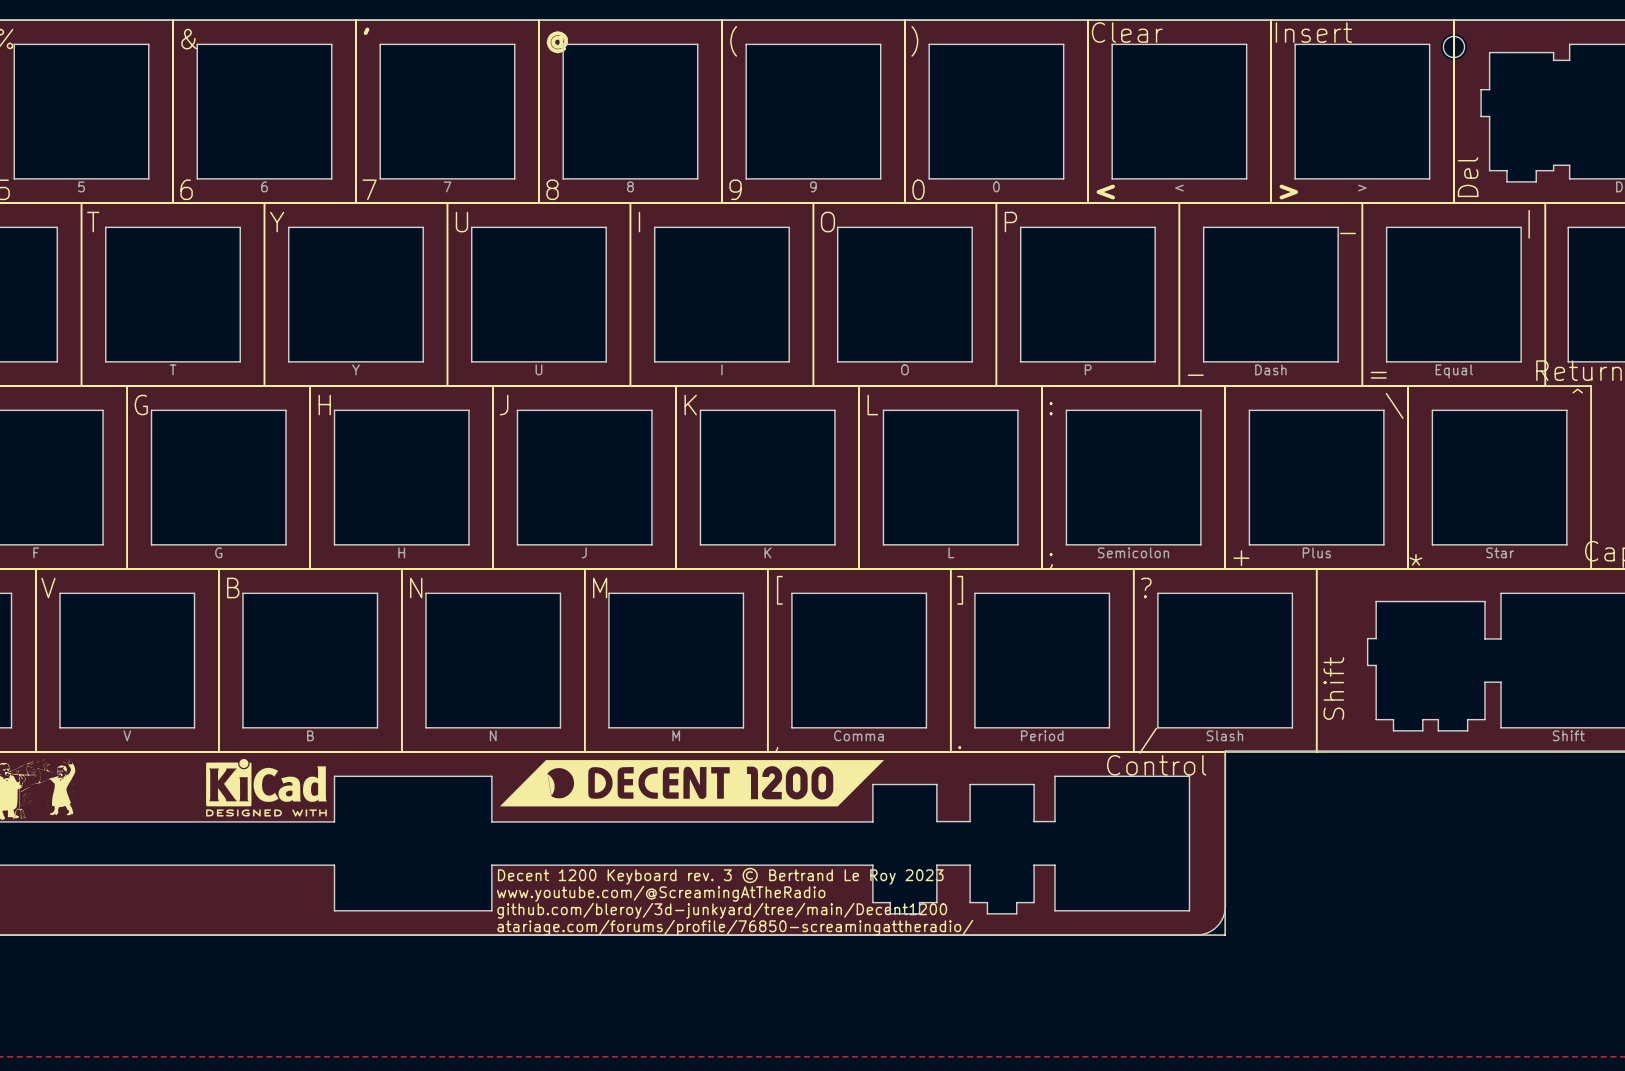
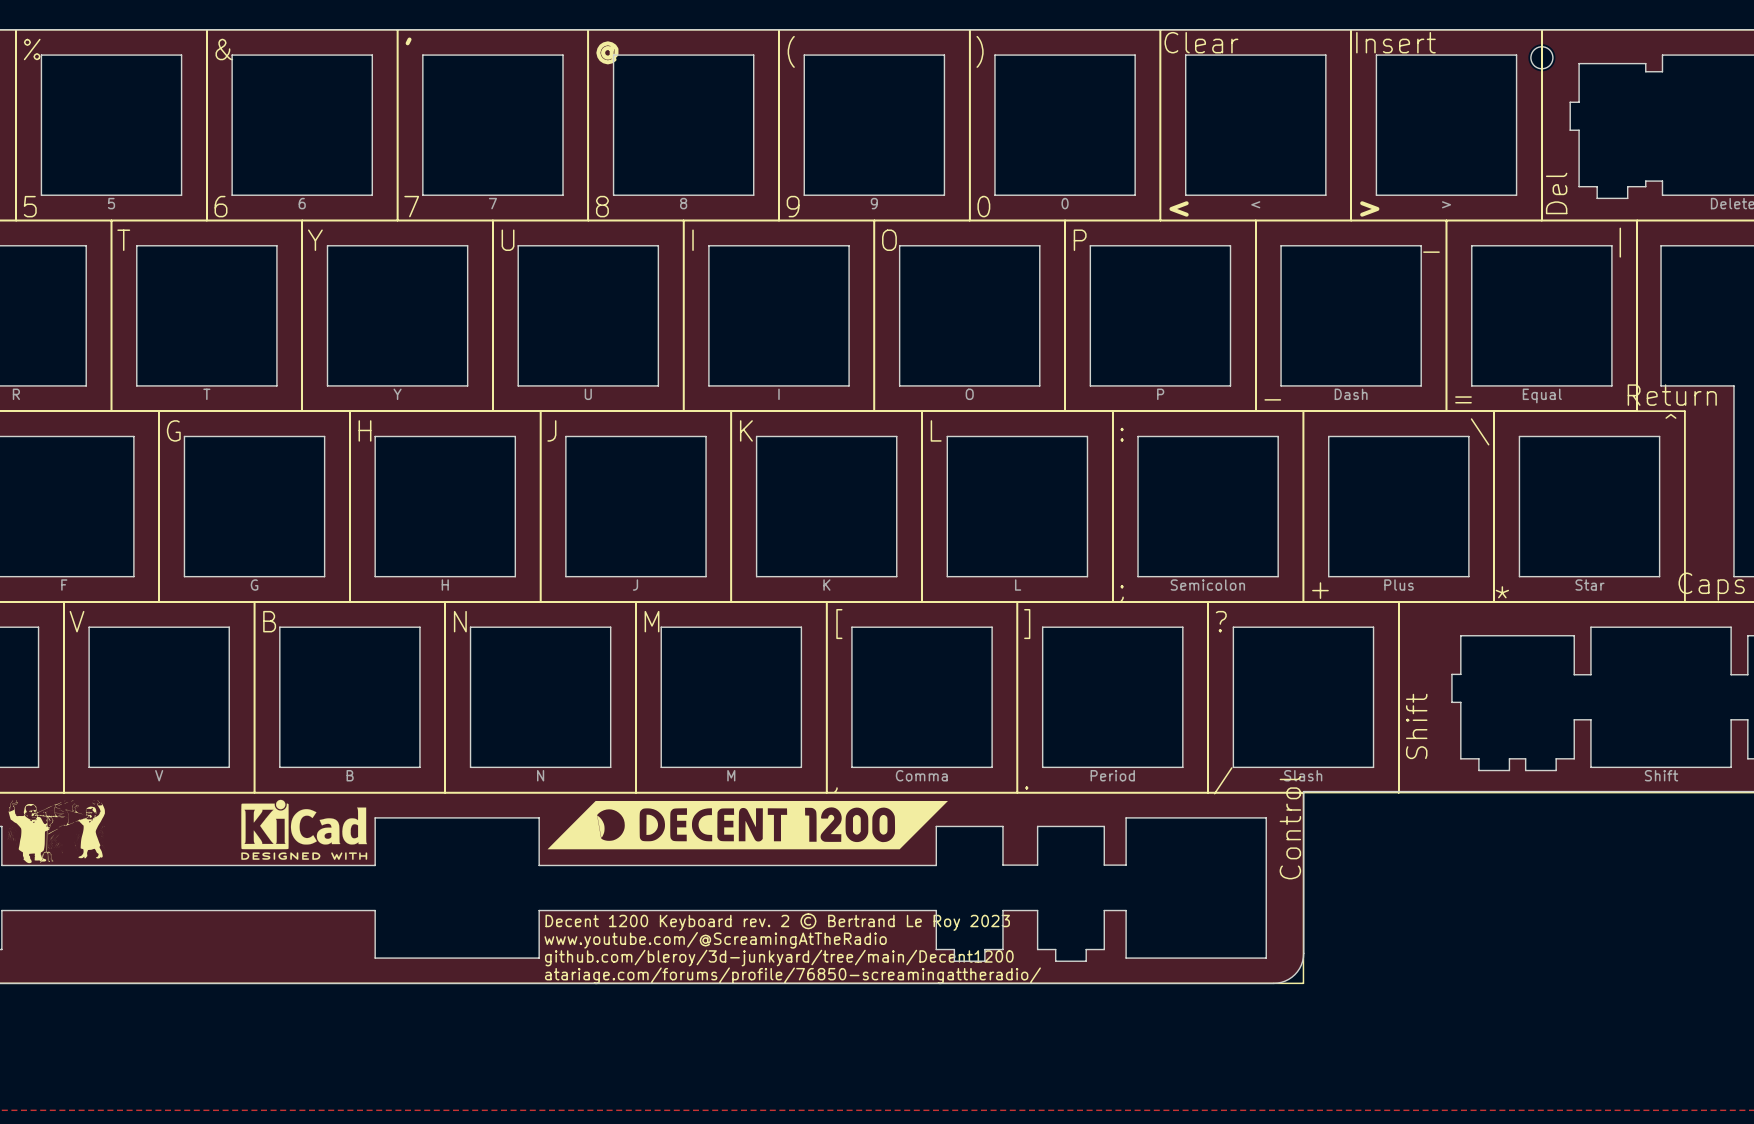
text rotation: 0° (1156, 765) -> 90° counterclockwise (1290, 827)
text: Decent 1200 Keyboard rev. 3 © Bertrand Le Roy 2023 (720, 876) -> Decent 1200 Keyboard rev. 2 © Bertrand Le Roy 2023 (777, 922)

